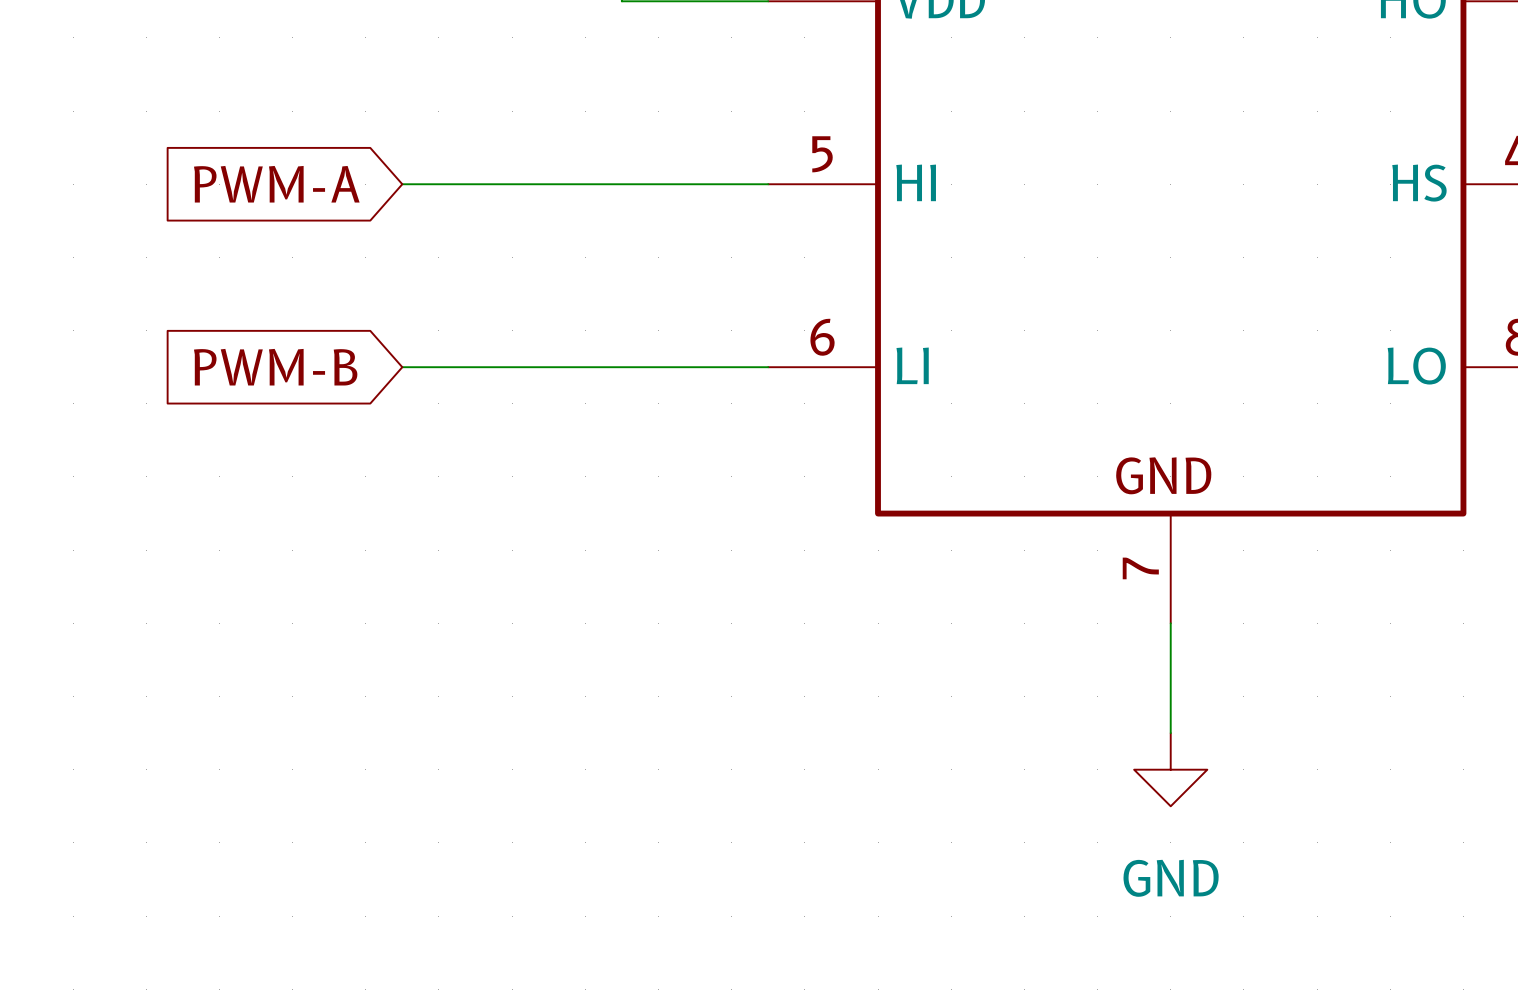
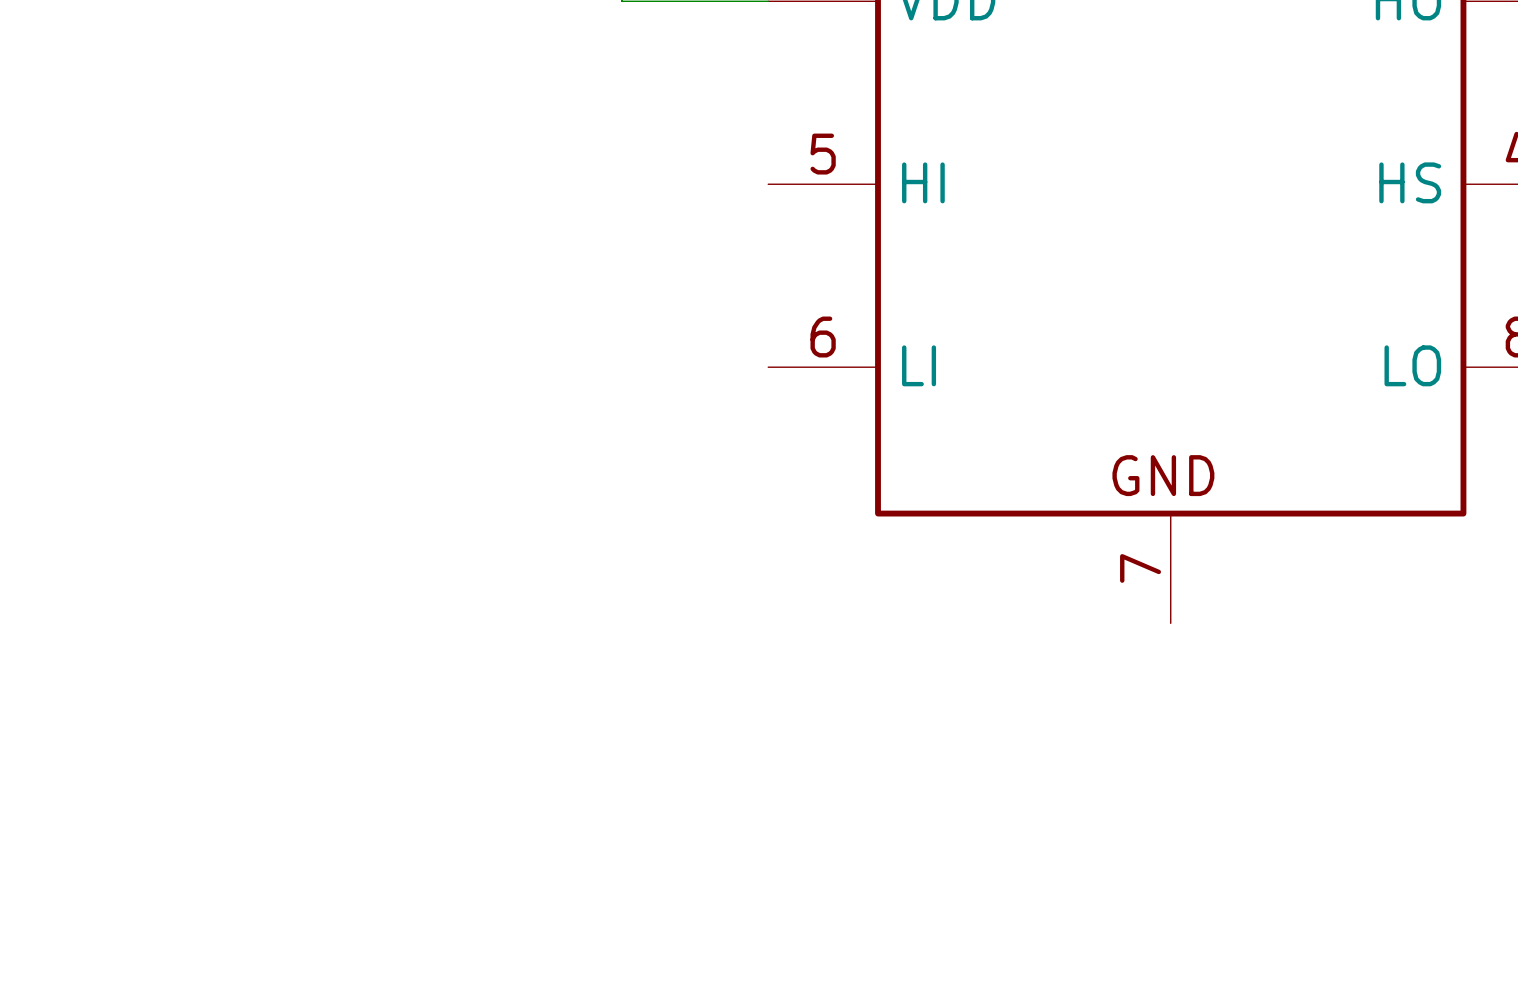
global label: PWM-A (276, 184) -> none
wire: (402, 184) (768, 184) -> none
global label: PWM-B (275, 367) -> none
wire: (402, 367) (768, 367) -> none
wire: (1170, 623) (1170, 733) -> none
power symbol: GND (1170, 769) -> none

